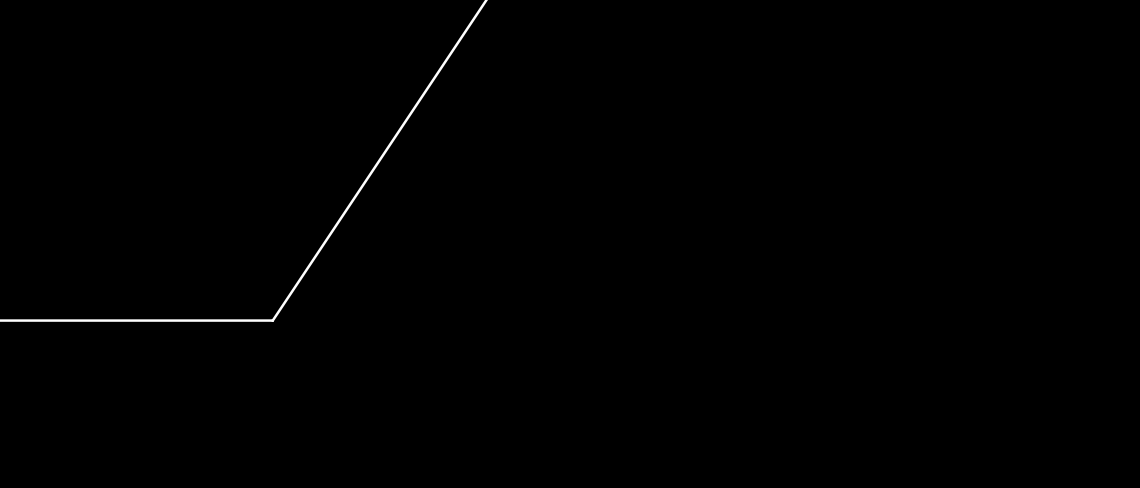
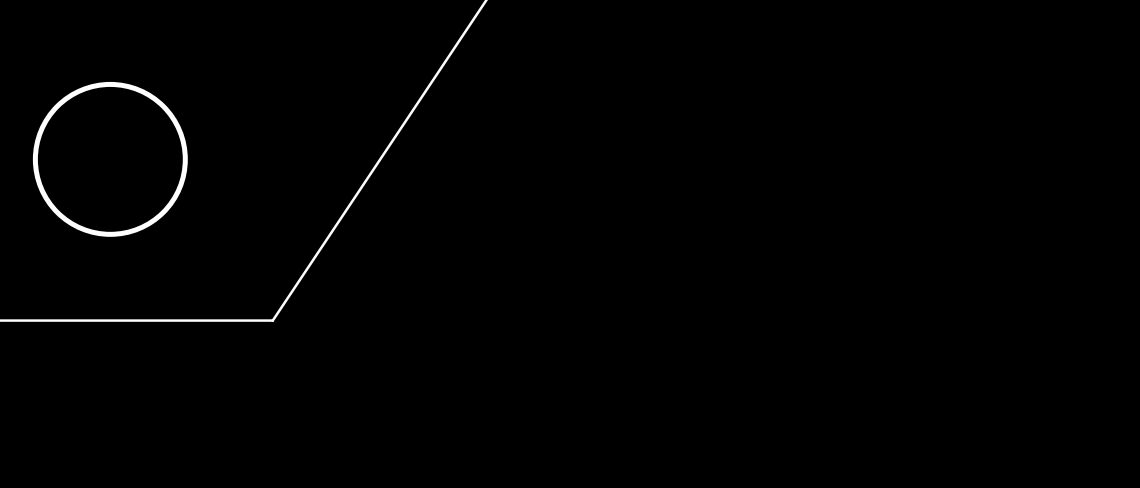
round board edge: none -> [32, 81, 188, 237]

